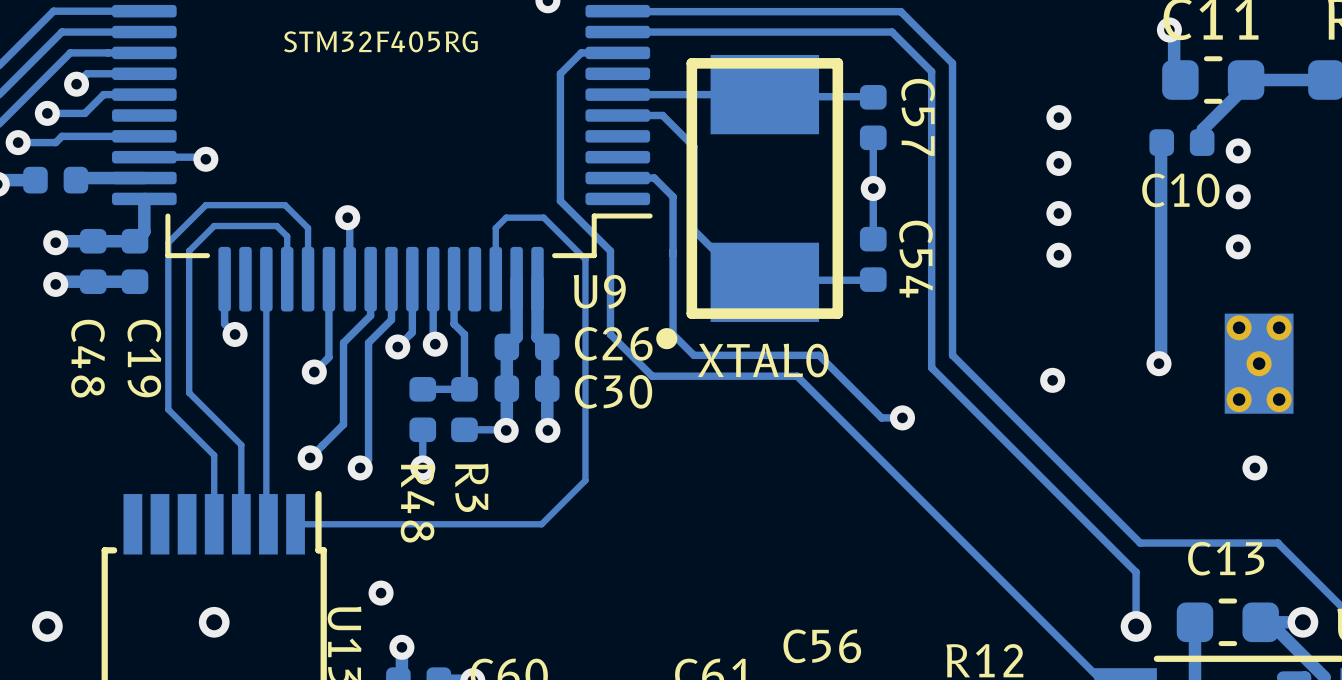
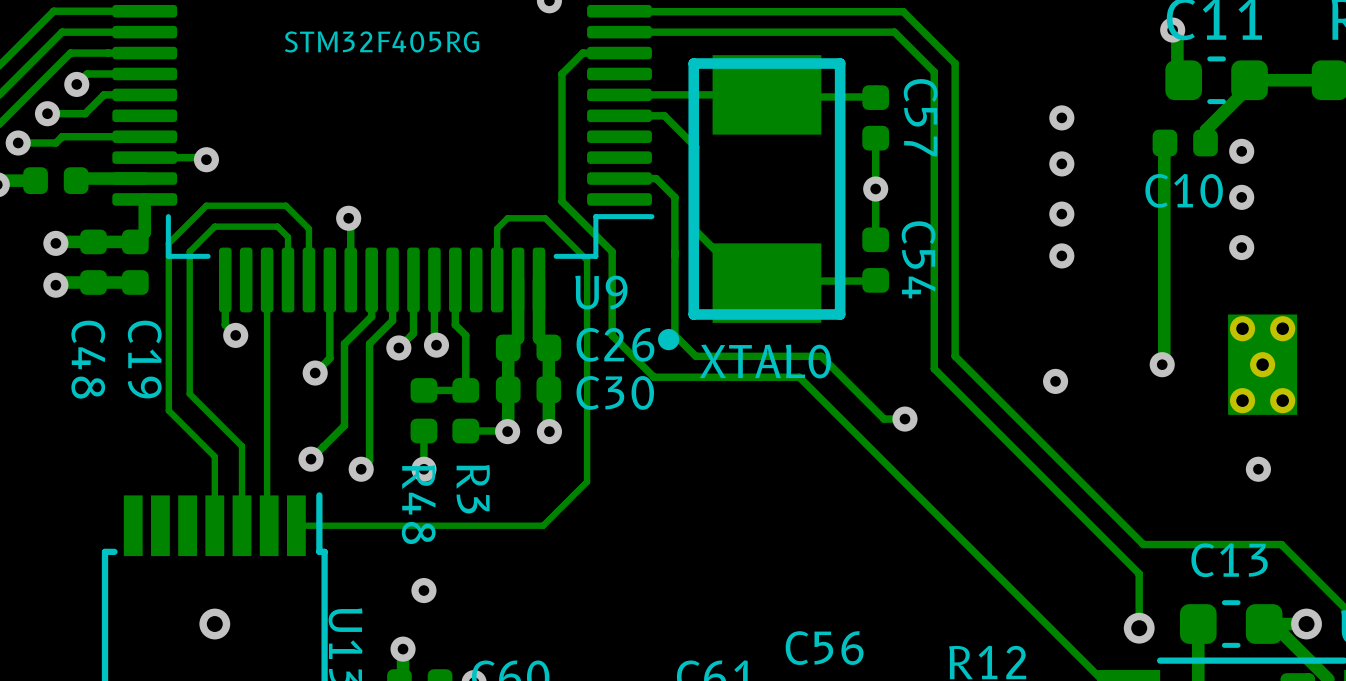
via position: (381, 593) -> (423, 590)
via: (47, 626) -> none

